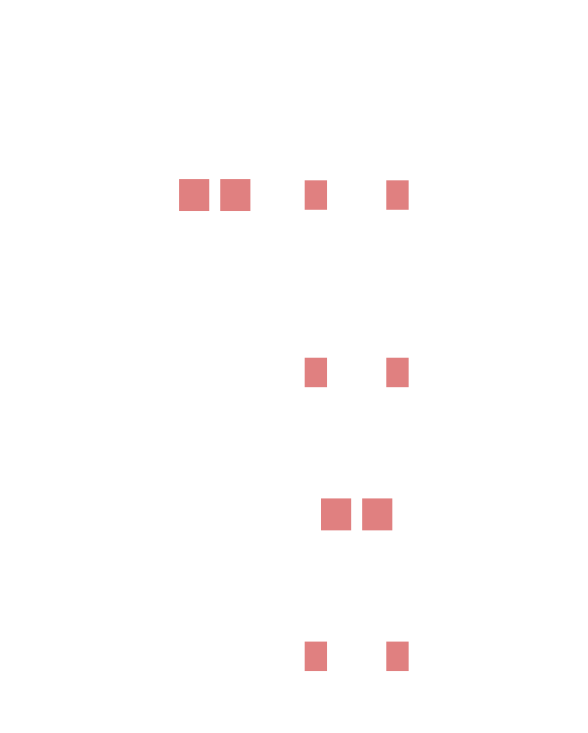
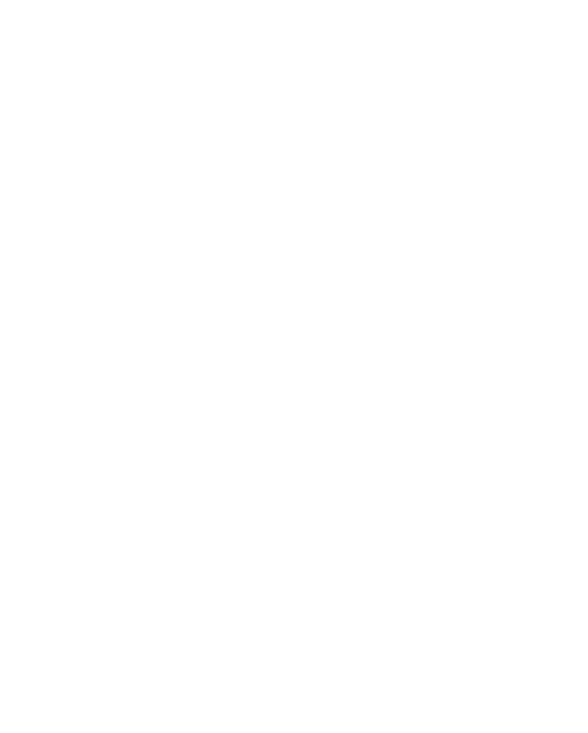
part: (214, 195) -> none
part: (356, 195) -> none
part: (356, 372) -> none
part: (356, 514) -> none
part: (356, 656) -> none

